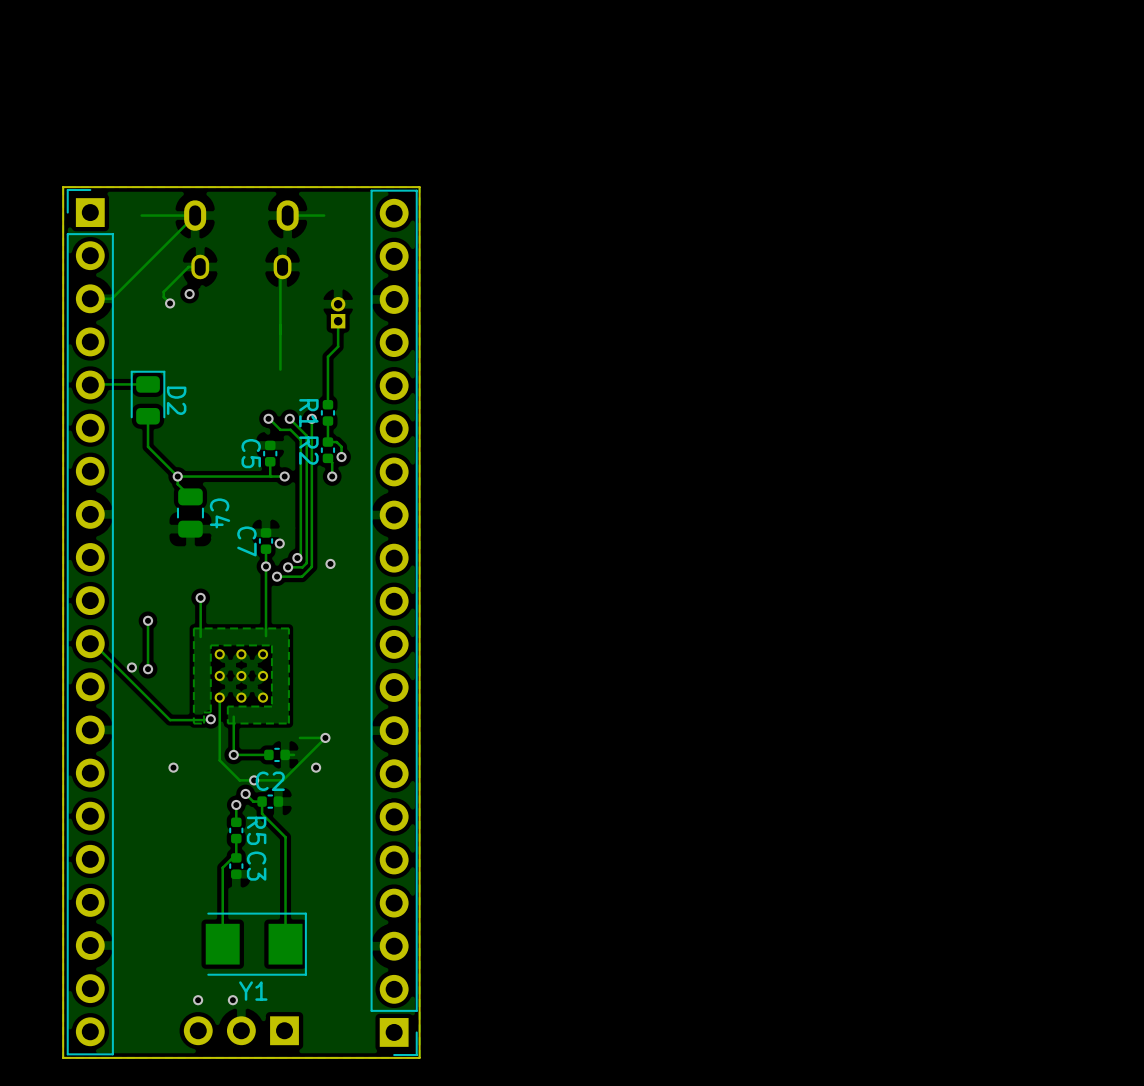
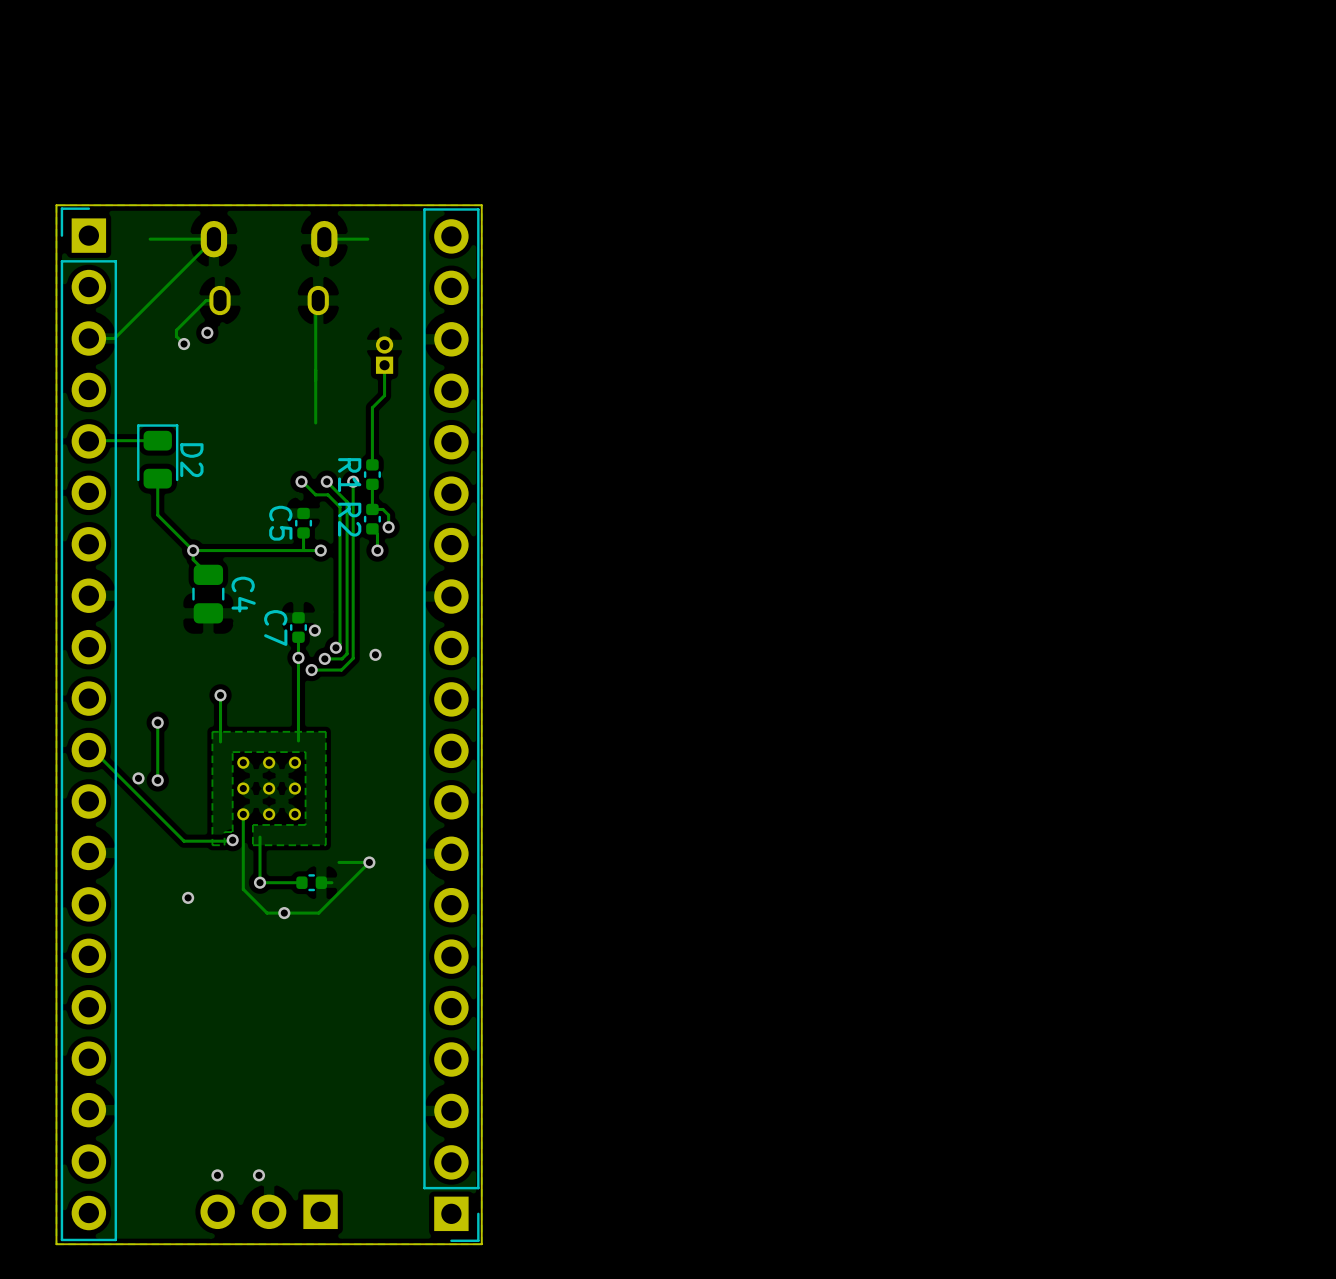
via: (316, 767) -> none
track: (245, 793) (253, 801) (262, 801) (262, 813) (285, 837) (285, 944) -> none
via: (245, 793) -> none
C2: (270, 801) -> none
track: (236, 804) (236, 822) -> none
via: (236, 804) -> none
R5: (236, 830) -> none
track: (236, 838) (236, 857) (232, 857) (222, 867) (222, 944) -> none
C3: (236, 866) -> none
Y1: (256, 944) -> none

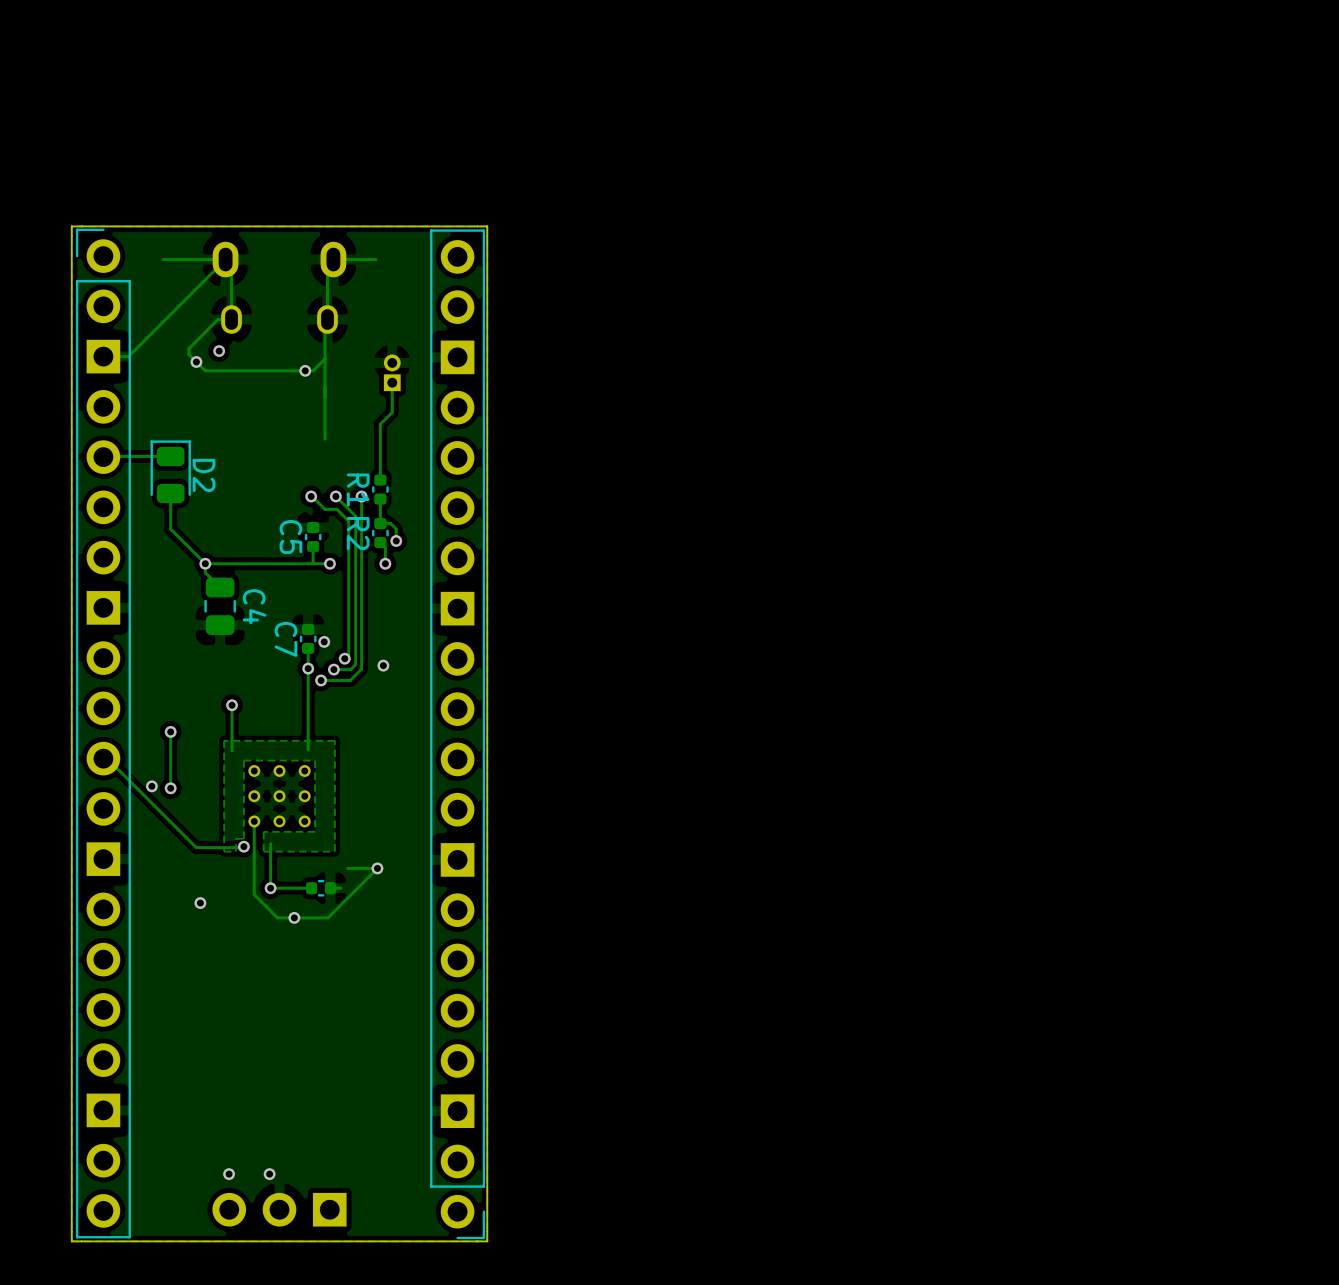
part footprint: [60, 207, 118, 1242] -> [75, 228, 131, 1239]
part footprint: [423, 208, 480, 1242] -> [430, 229, 486, 1240]
track: none -> (225, 259) (231, 265) (231, 319)
track: none -> (333, 259) (327, 265) (327, 319)
track: none -> (325, 358) (313, 370) (205, 370) (196, 362)
via: none -> (305, 370)

